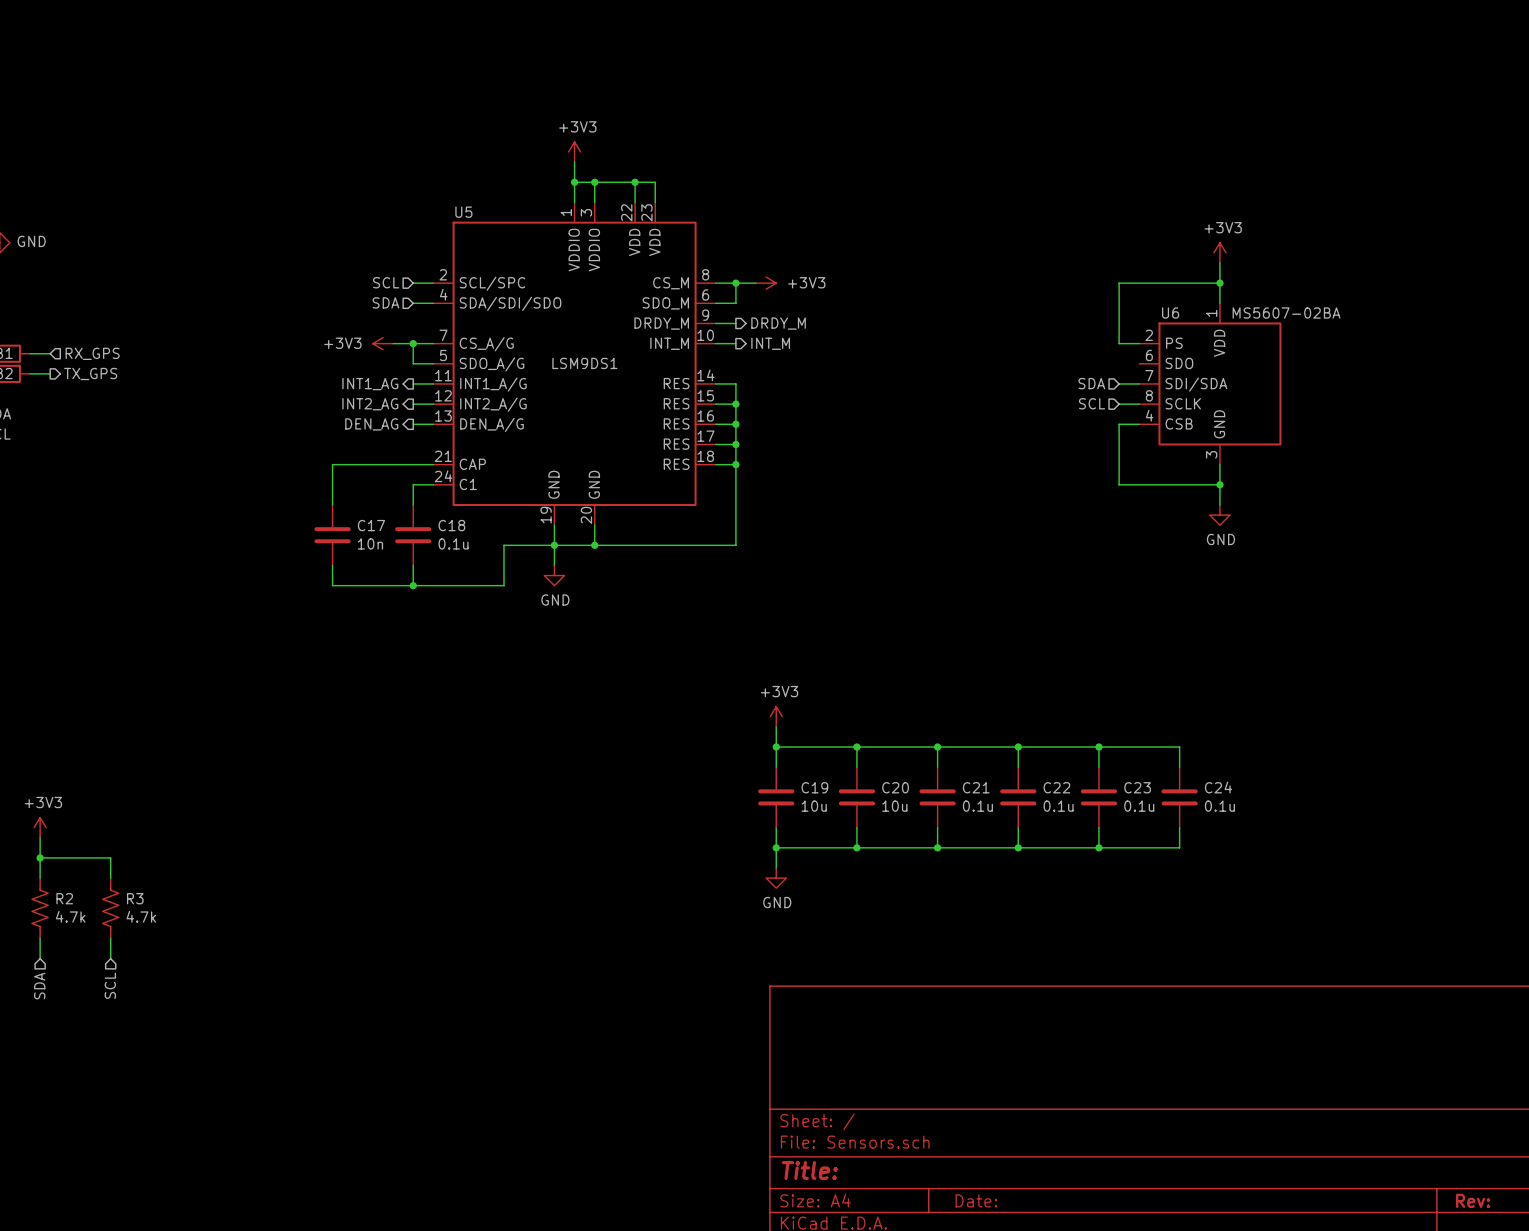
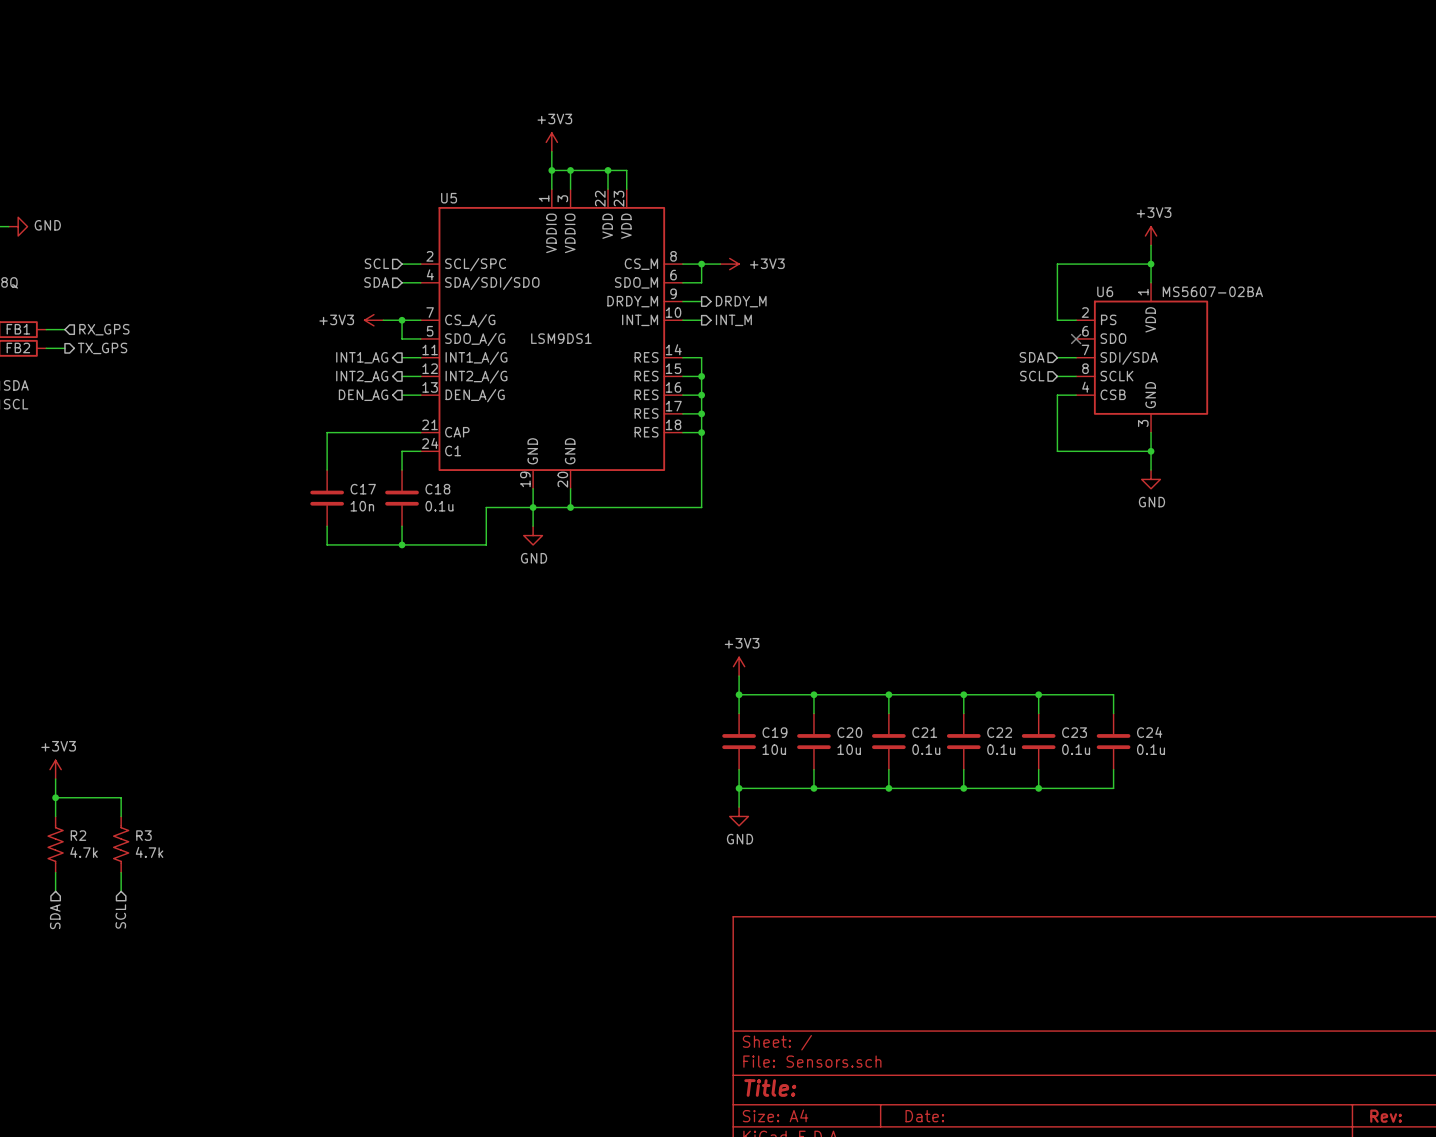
no-connect mark: none -> (1076, 338)

